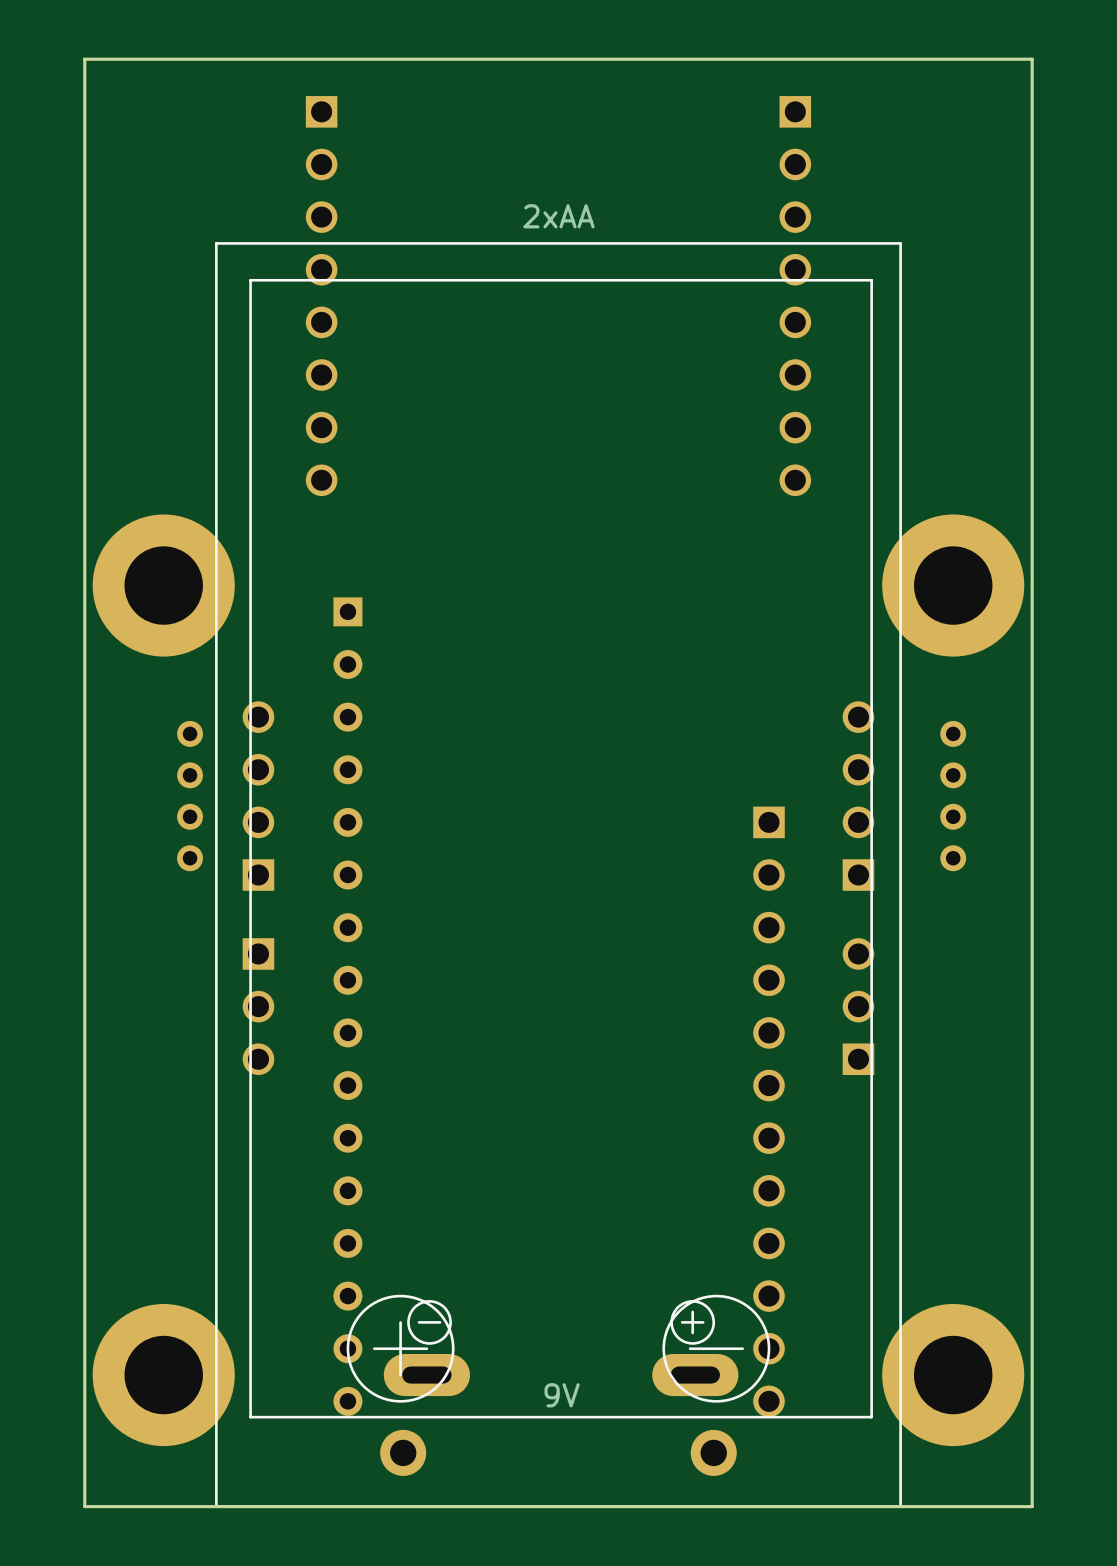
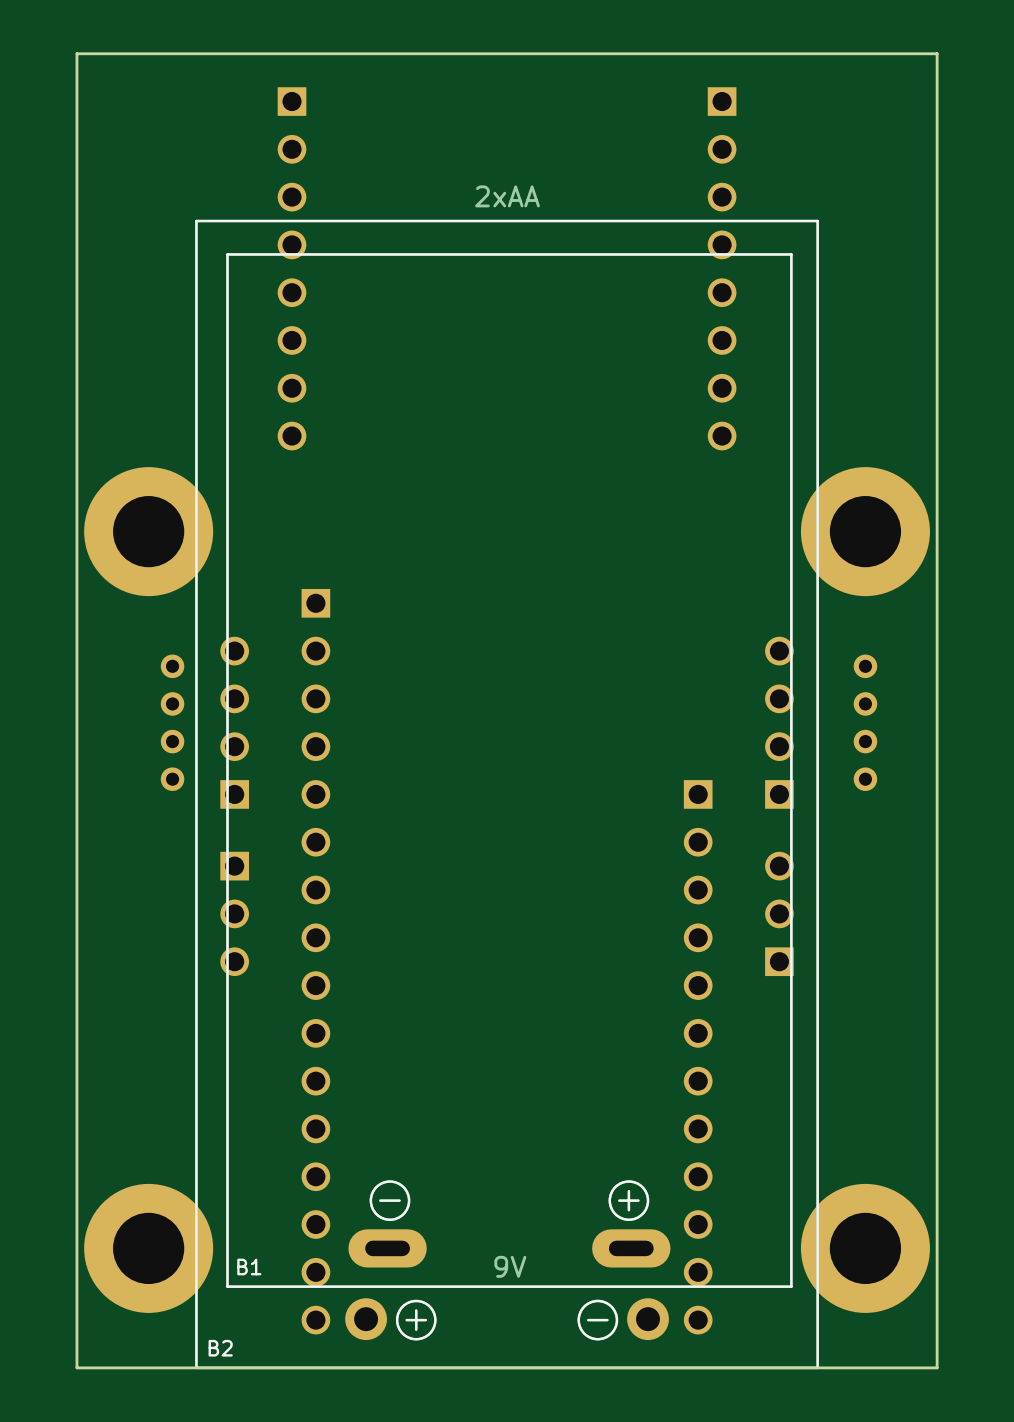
part: 9V (561, 848) -> none
B1: none -> 9V (509, 770)
part: 2xAA (558, 875) -> none
B2: none -> 2xAA (507, 794)
part: (347, 1006) -> none
part: none -> (315, 961)
part position: (769, 1111) -> (698, 1057)

